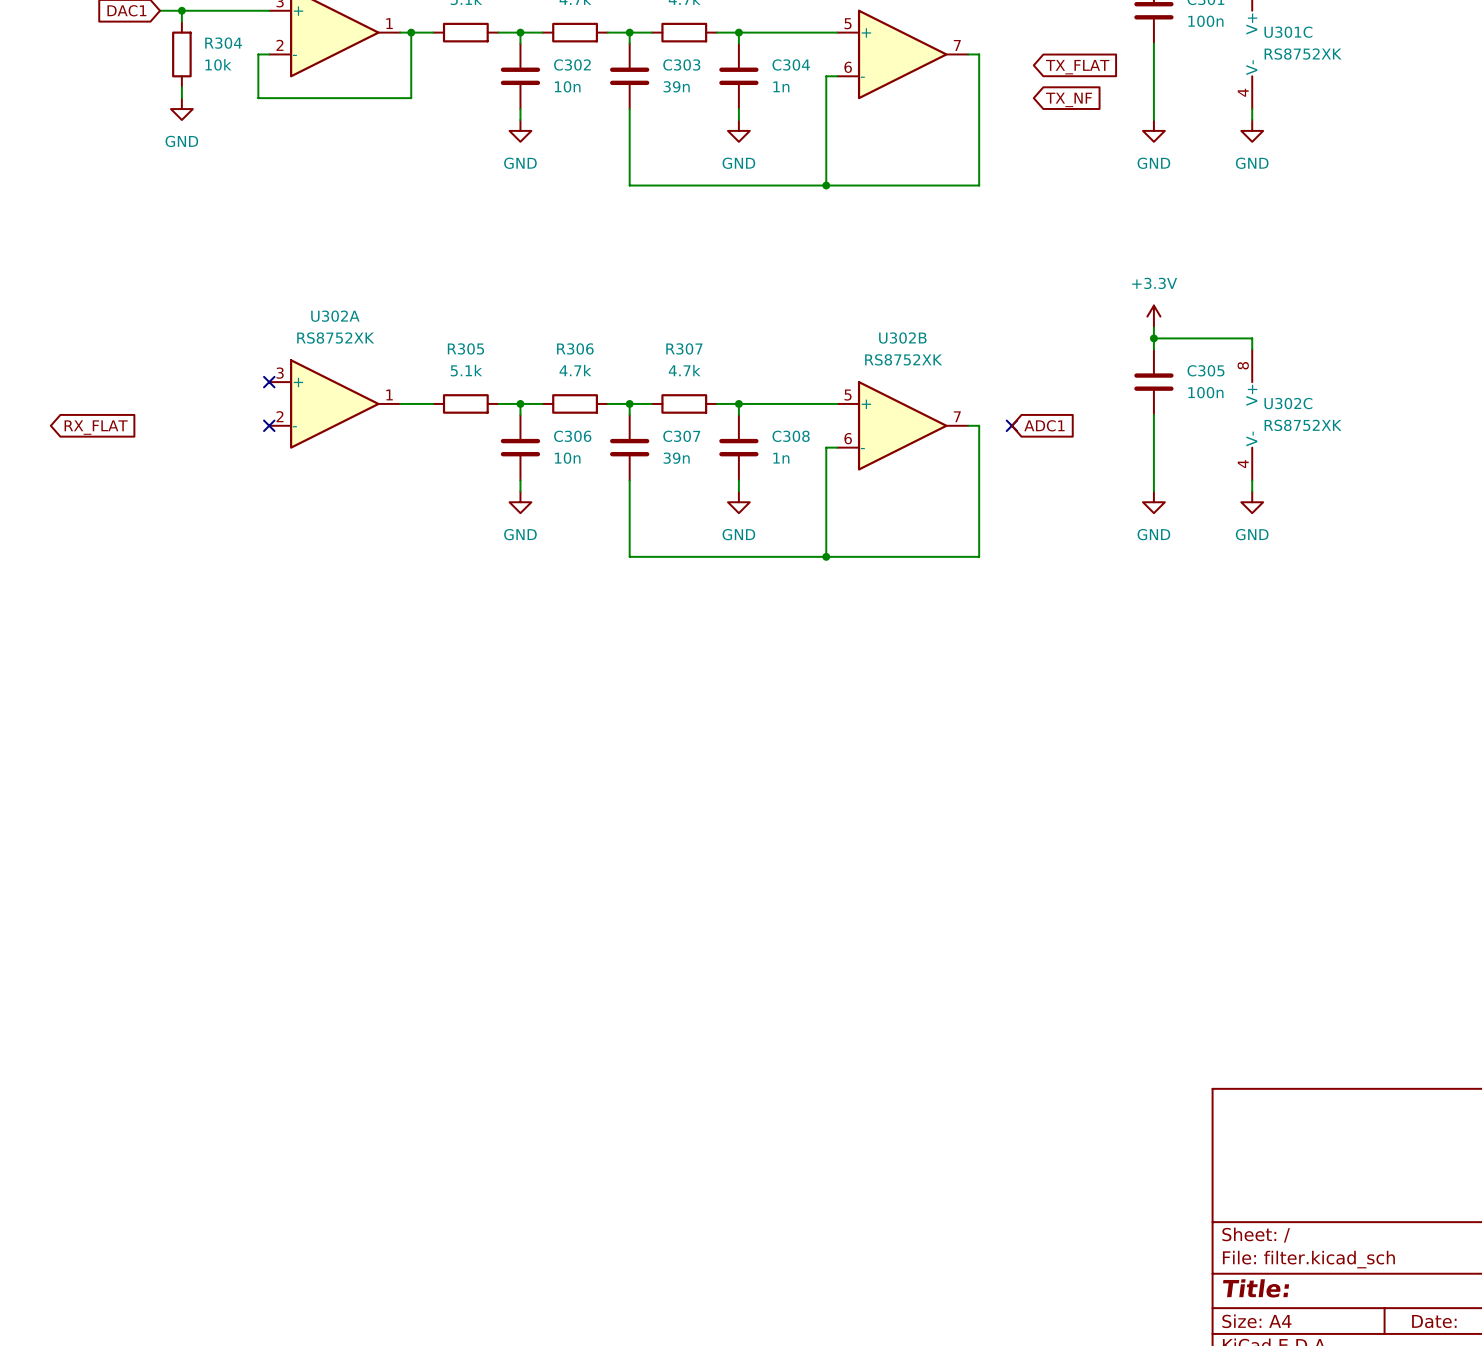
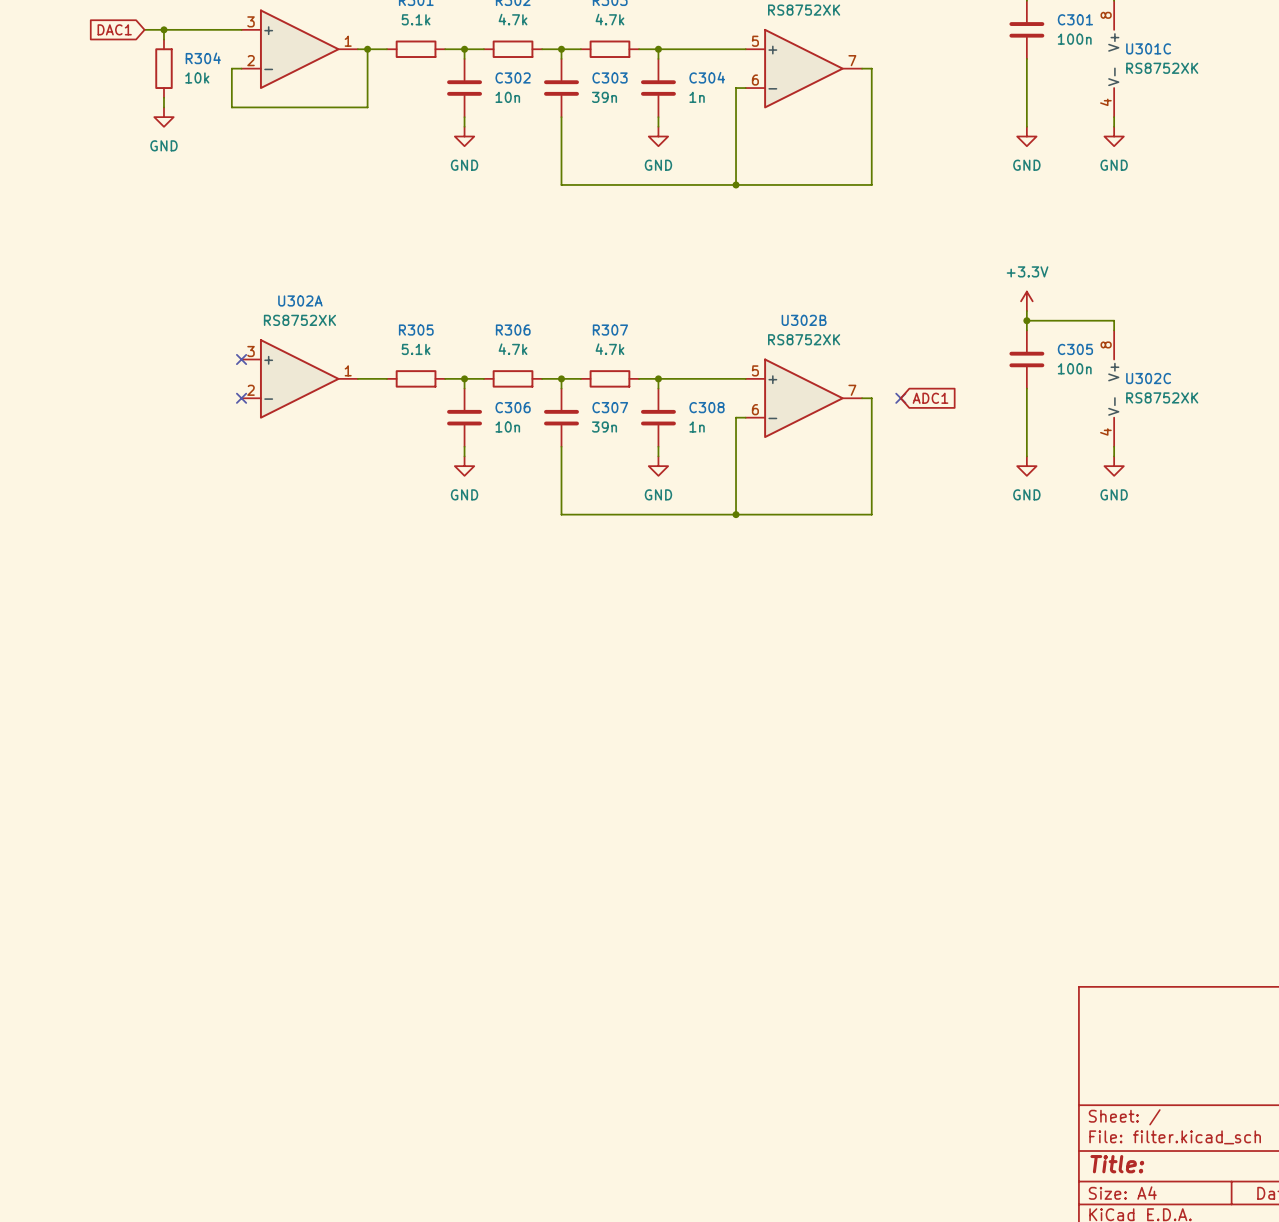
global label: TX_FLAT (1077, 67) -> none
global label: TX_NF (1068, 99) -> none
global label: RX_FLAT (96, 427) -> none

